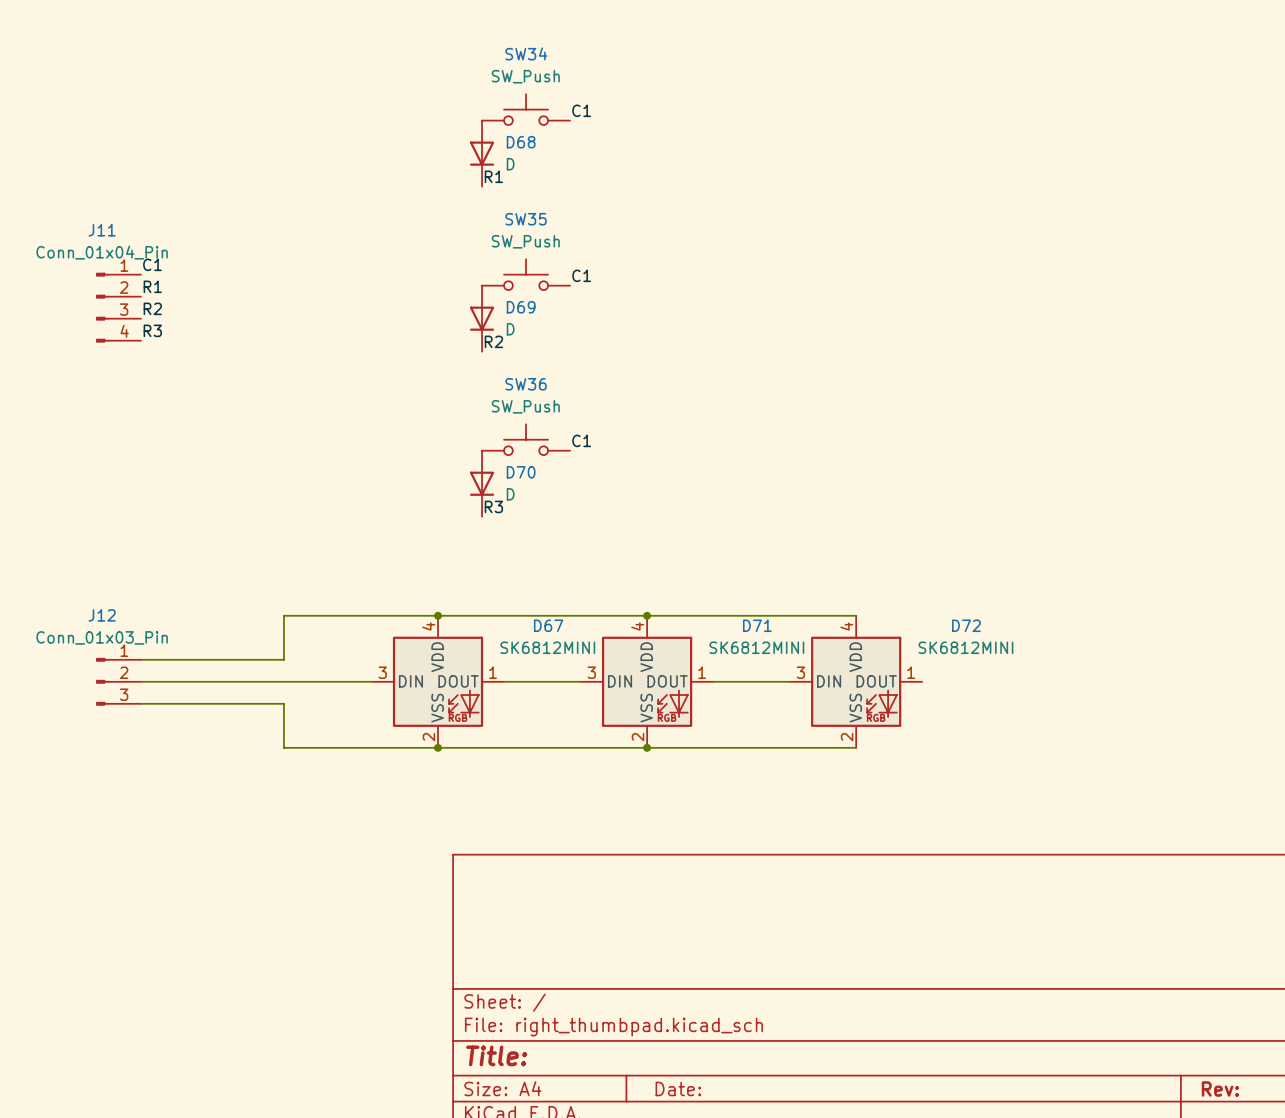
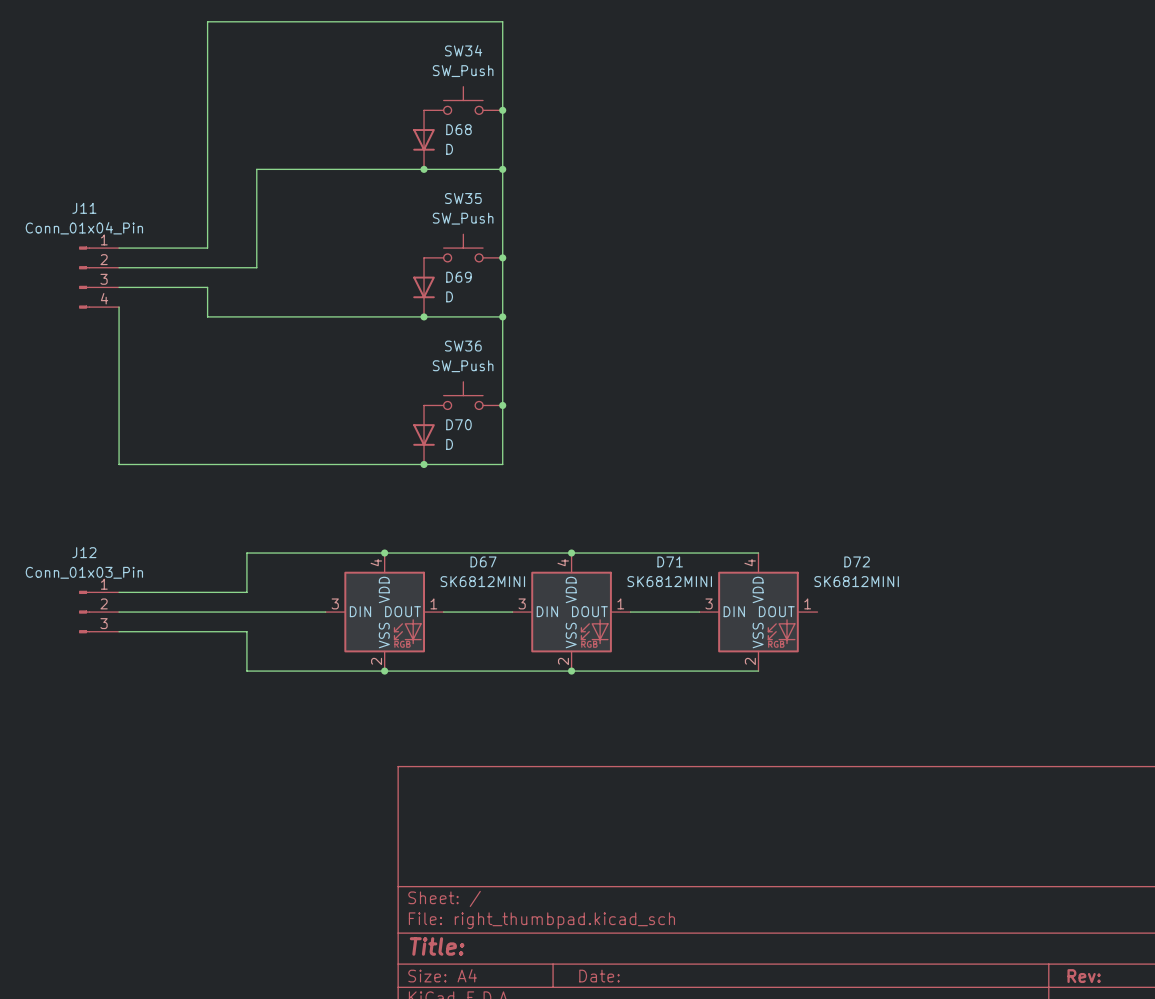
label: C1 (581, 110) -> none
junction: none -> (502, 110)
label: R1 (493, 176) -> none
junction: none -> (424, 169)
wire: none -> (502, 169) (256, 169) (256, 267) (119, 267)
junction: none -> (502, 169)
label: C1 (152, 264) -> none
wire: none -> (119, 248) (207, 248) (207, 21) (502, 21) (502, 464) (119, 464) (119, 307)
label: C1 (581, 275) -> none
junction: none -> (502, 257)
label: R1 (152, 286) -> none
label: R2 (152, 308) -> none
wire: none -> (119, 287) (207, 287) (207, 316) (502, 316)
label: R3 (152, 330) -> none
label: R2 (493, 341) -> none
junction: none -> (424, 316)
junction: none -> (502, 316)
label: C1 (581, 440) -> none
junction: none -> (502, 405)
label: R3 (493, 506) -> none
junction: none -> (424, 464)

